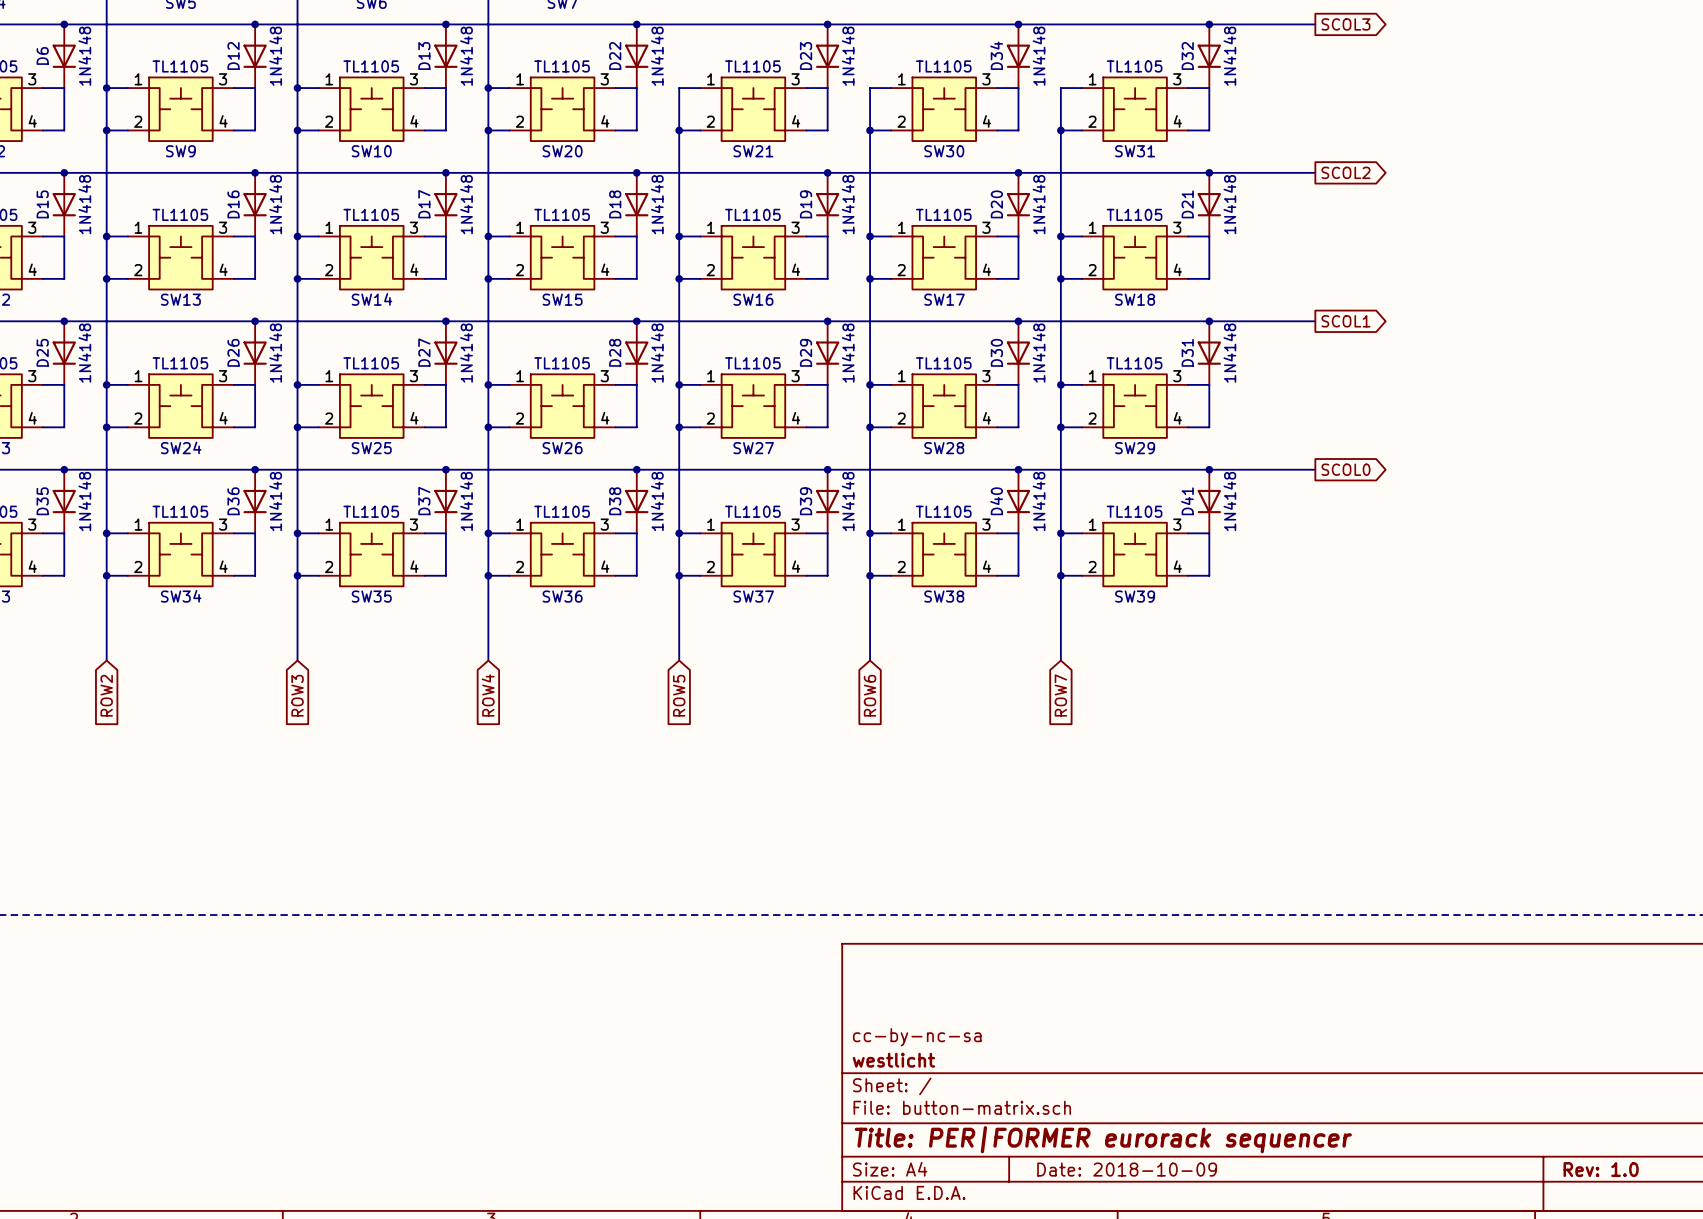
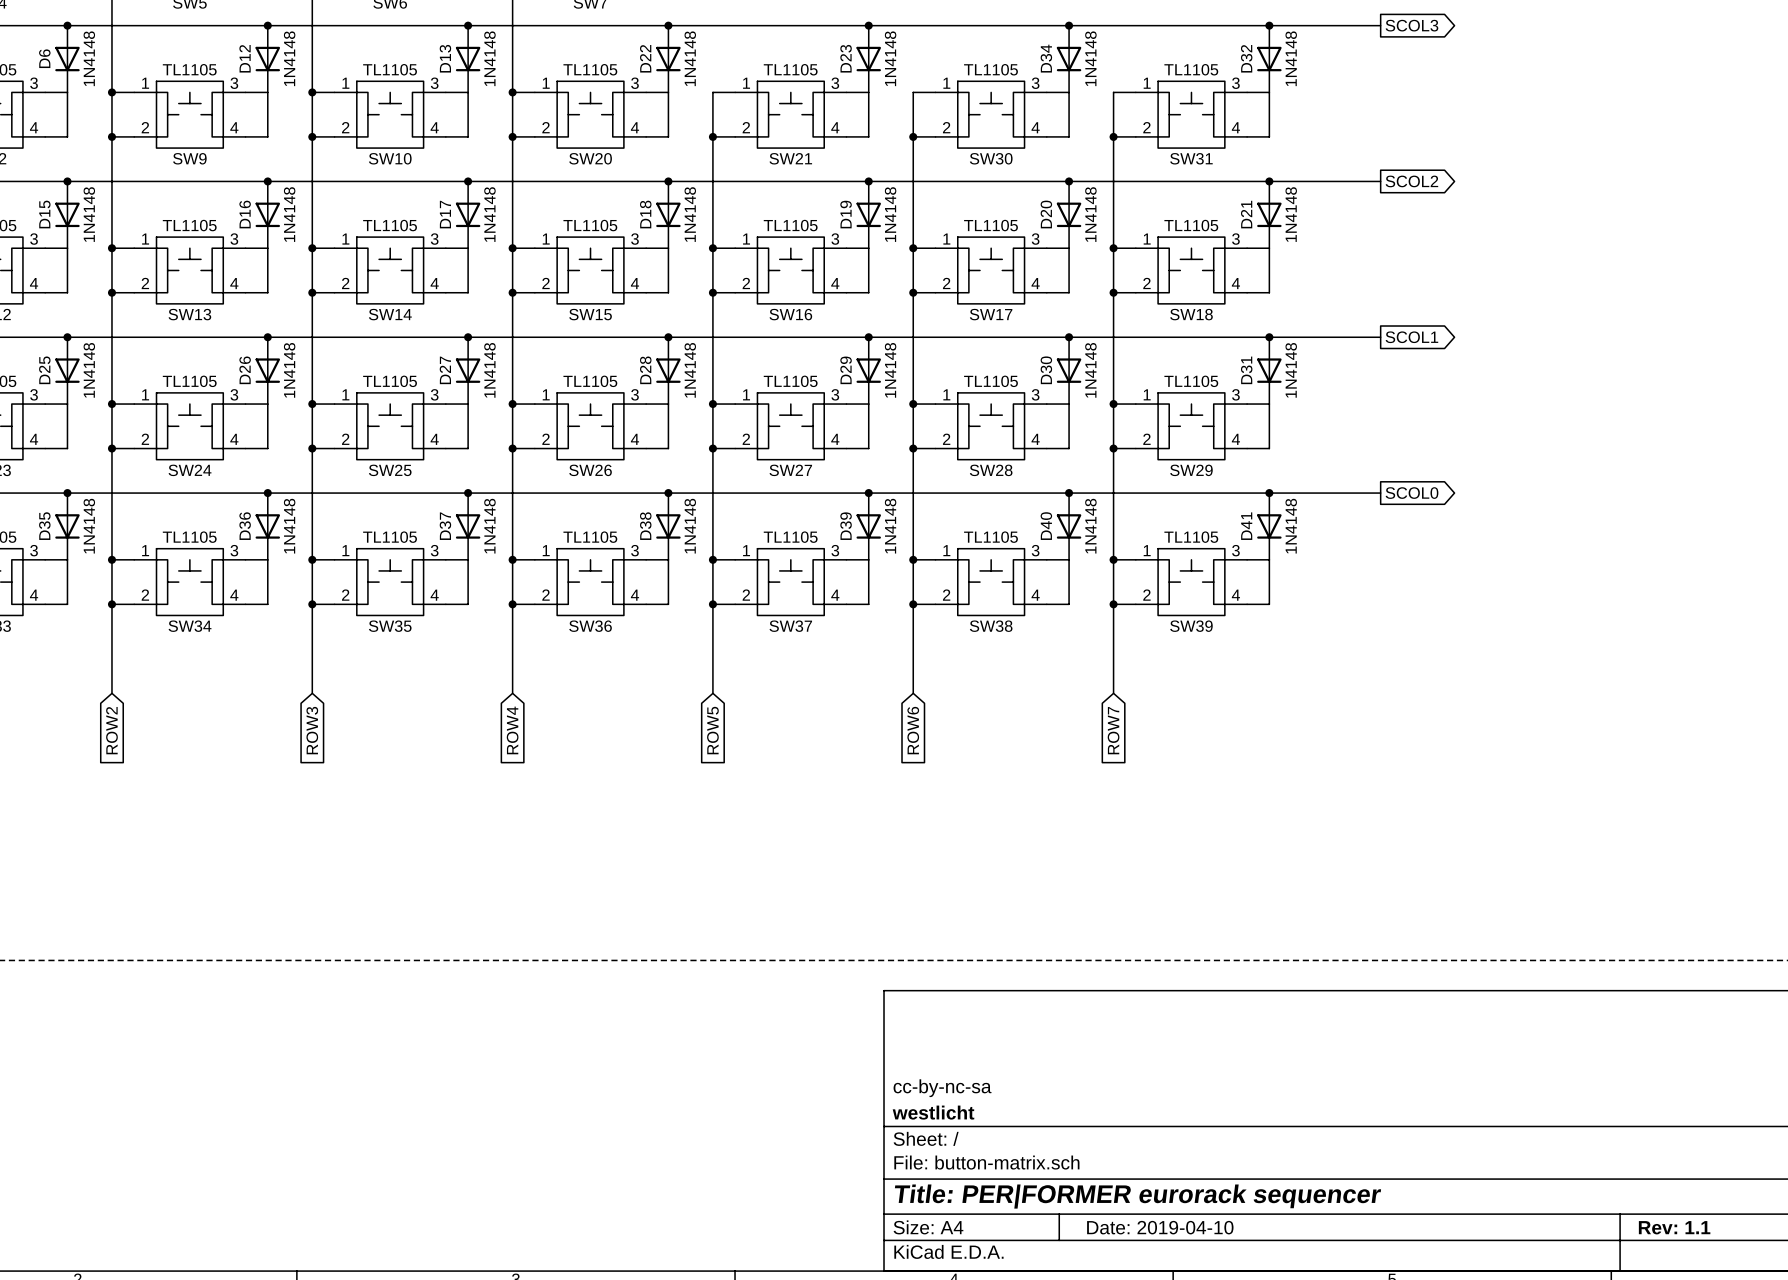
title block: Date: 2018-10-09 (1127, 1169) -> Date: 2019-04-10 (1160, 1227)
title block: Rev: 1.0 (1601, 1169) -> Rev: 1.1 (1674, 1227)

